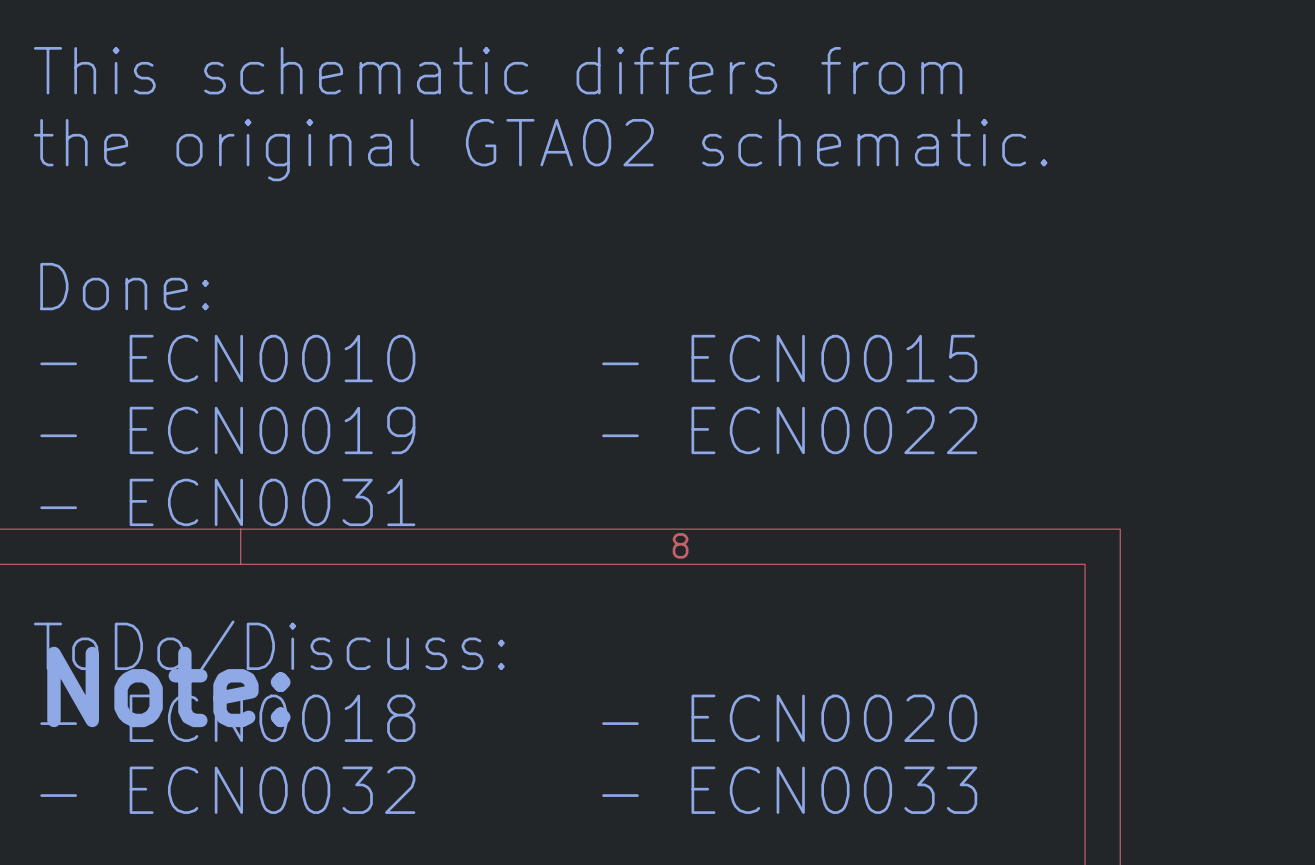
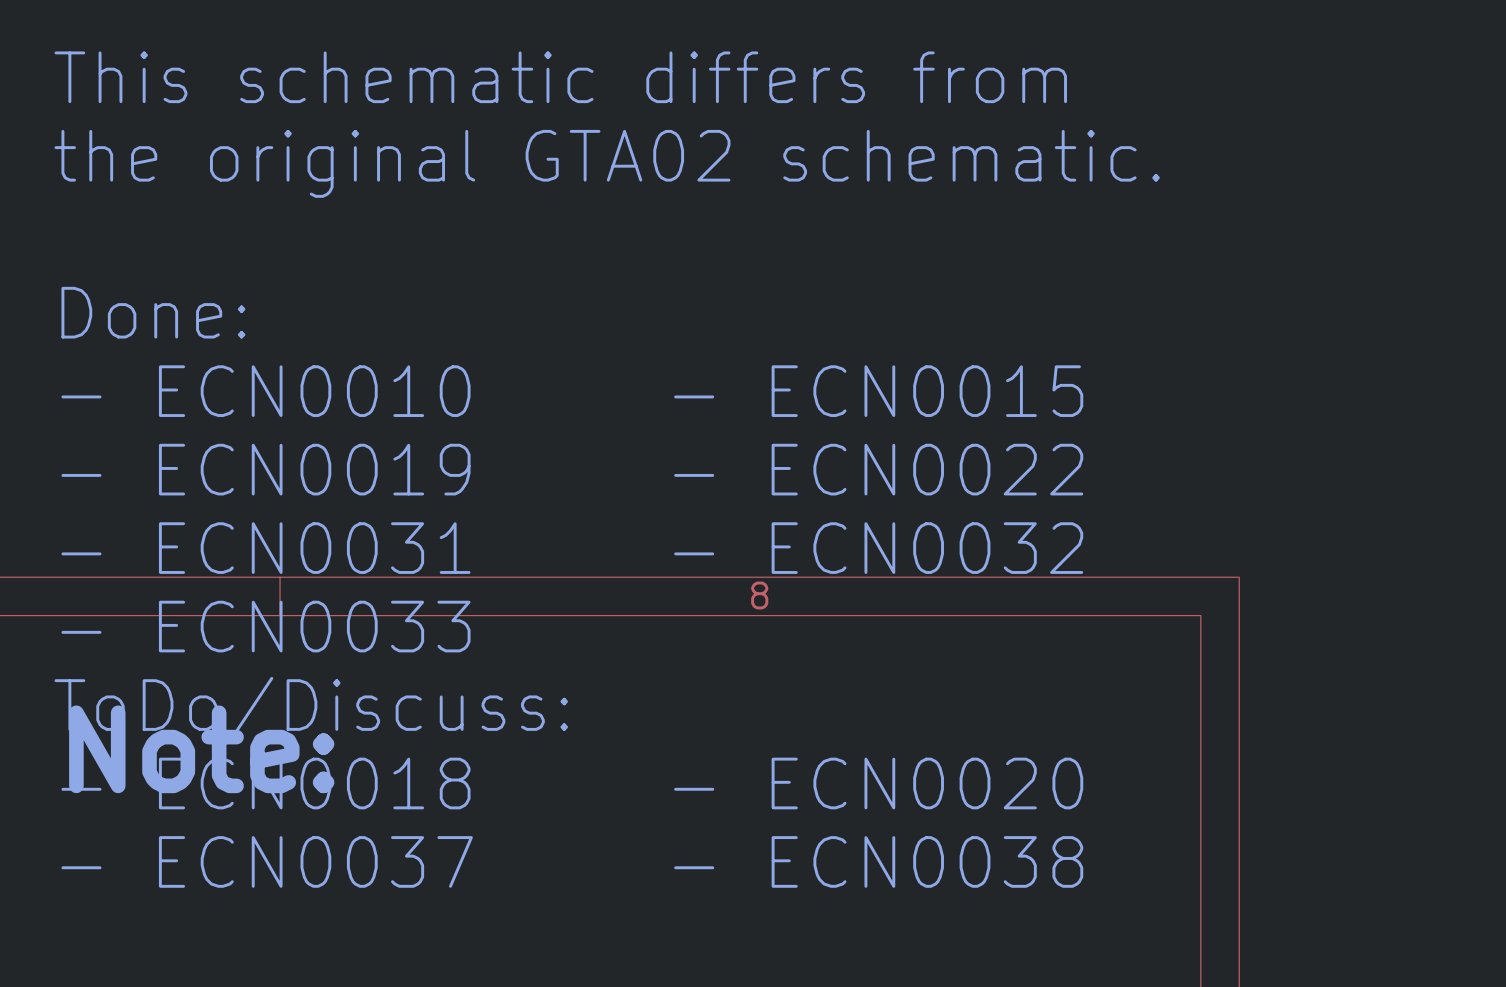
text: - ECN0031 (227, 502) -> - ECN0031 - ECN0032 (572, 548)
text: none -> - ECN0033 (265, 626)
text: - ECN0032 - ECN0033 (508, 790) -> - ECN0037 - ECN0038 (572, 861)

